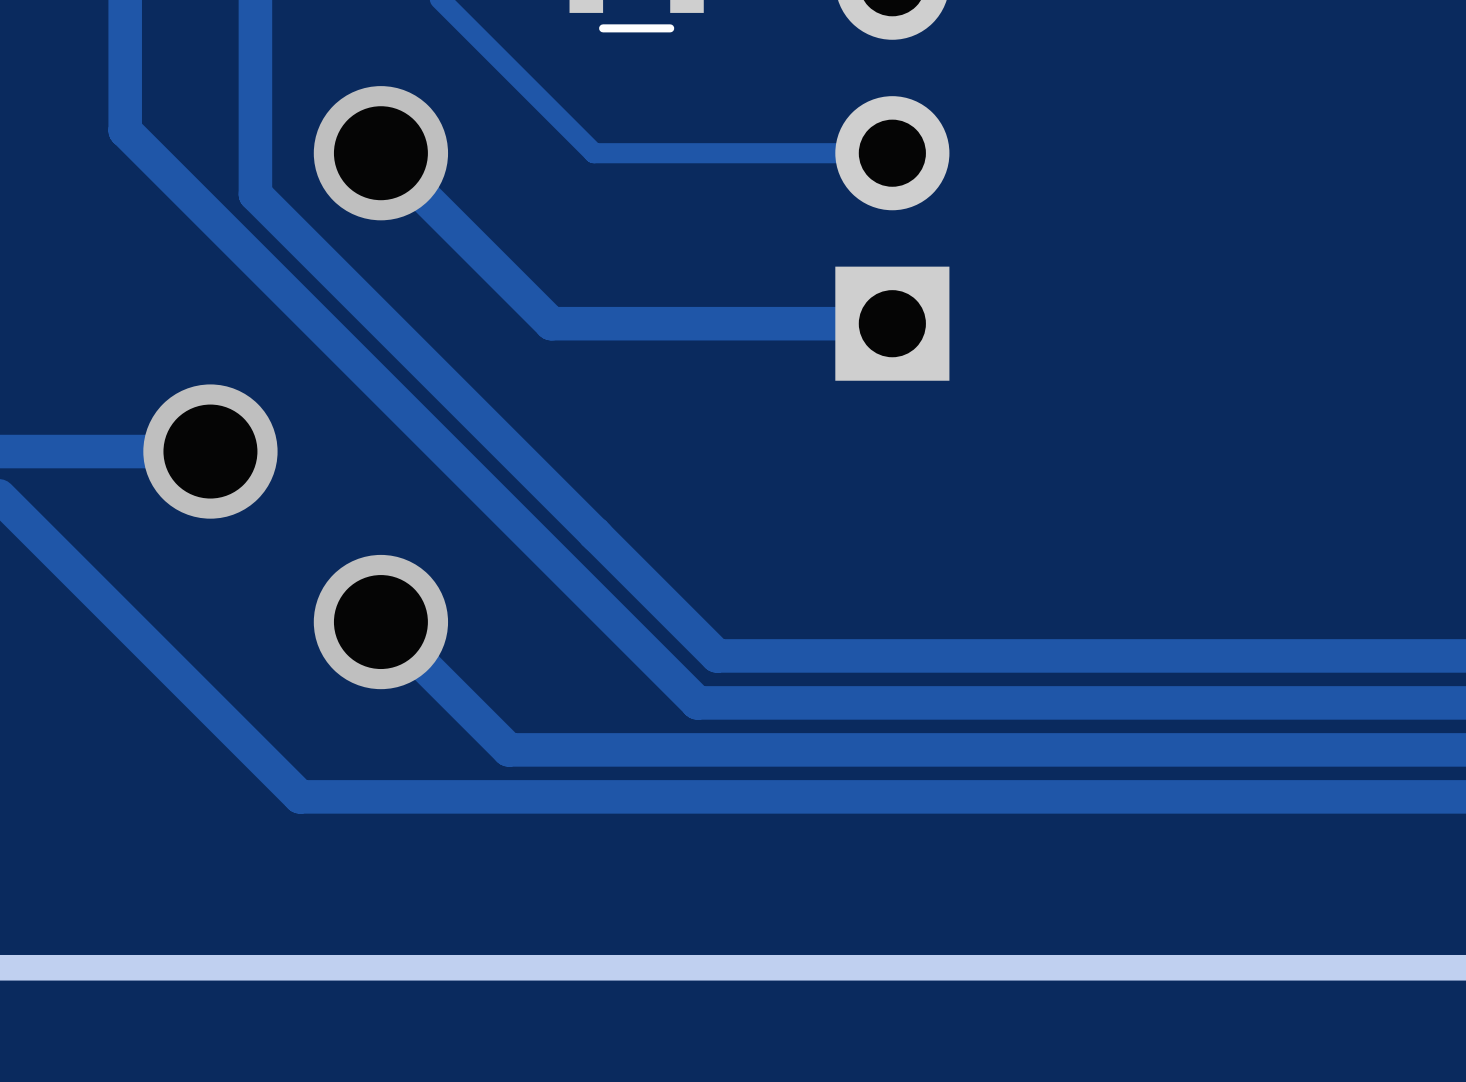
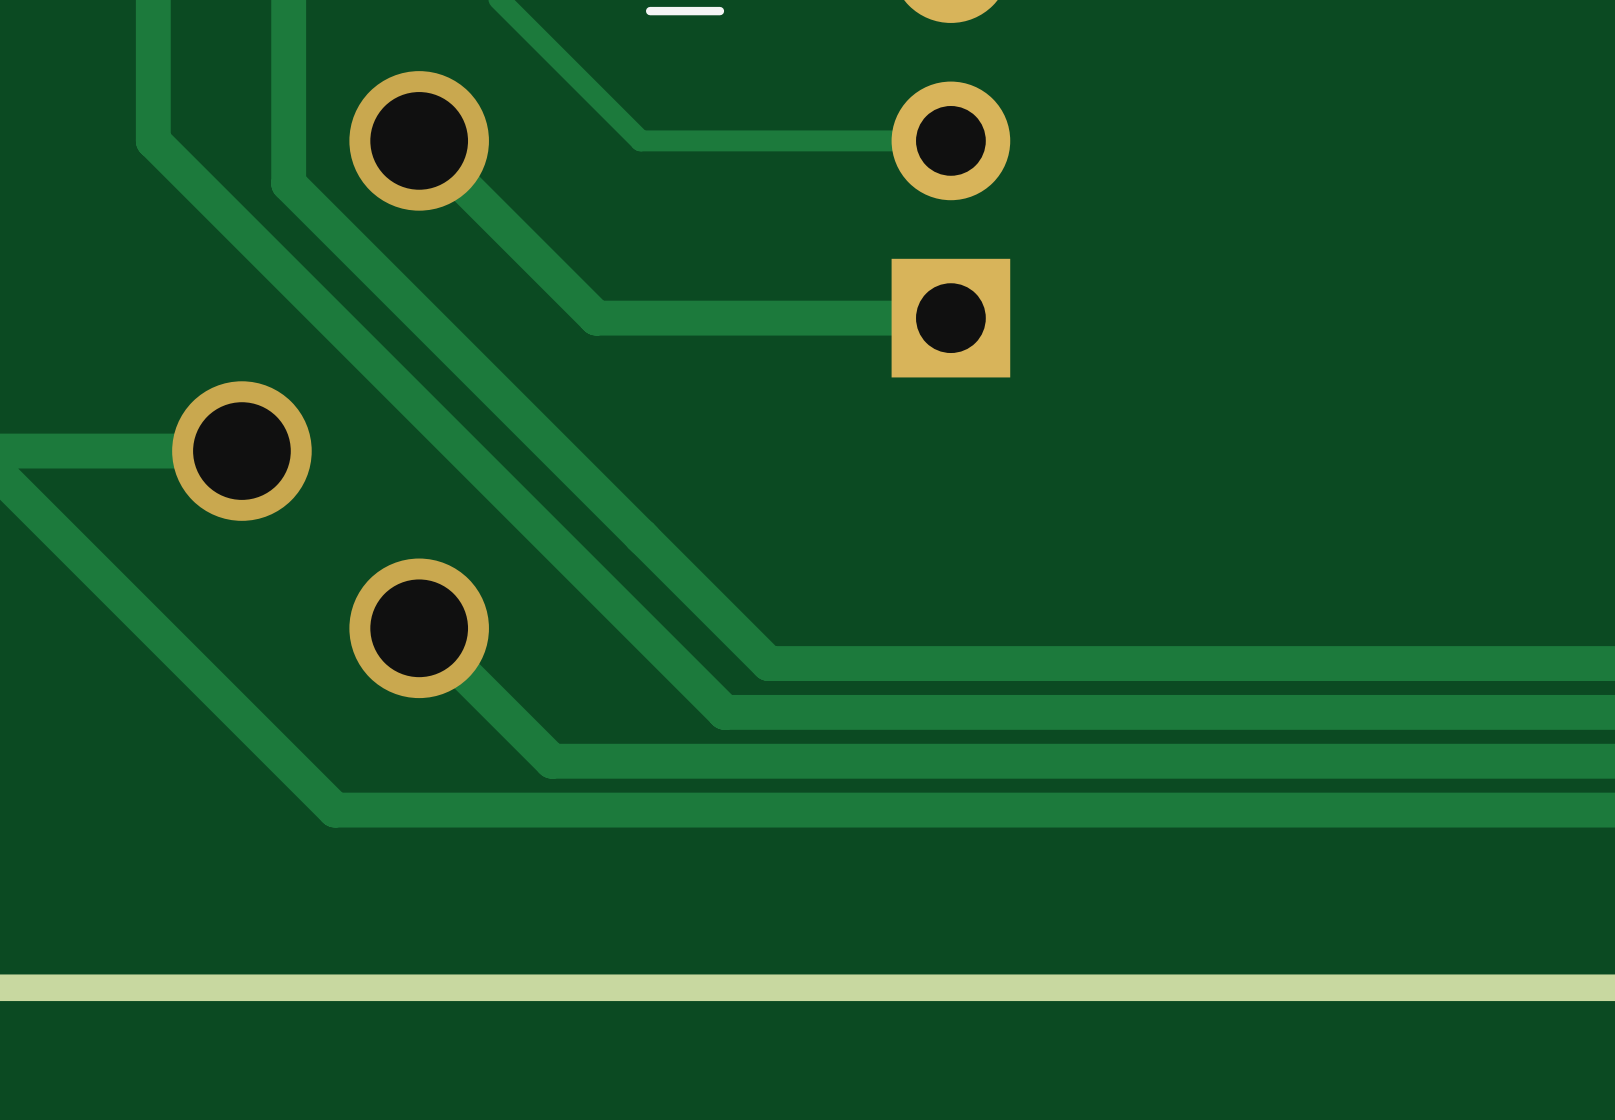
track: (125, 130) (697, 702) -> (153, 117) (153, 140) (724, 712) (748, 712)

